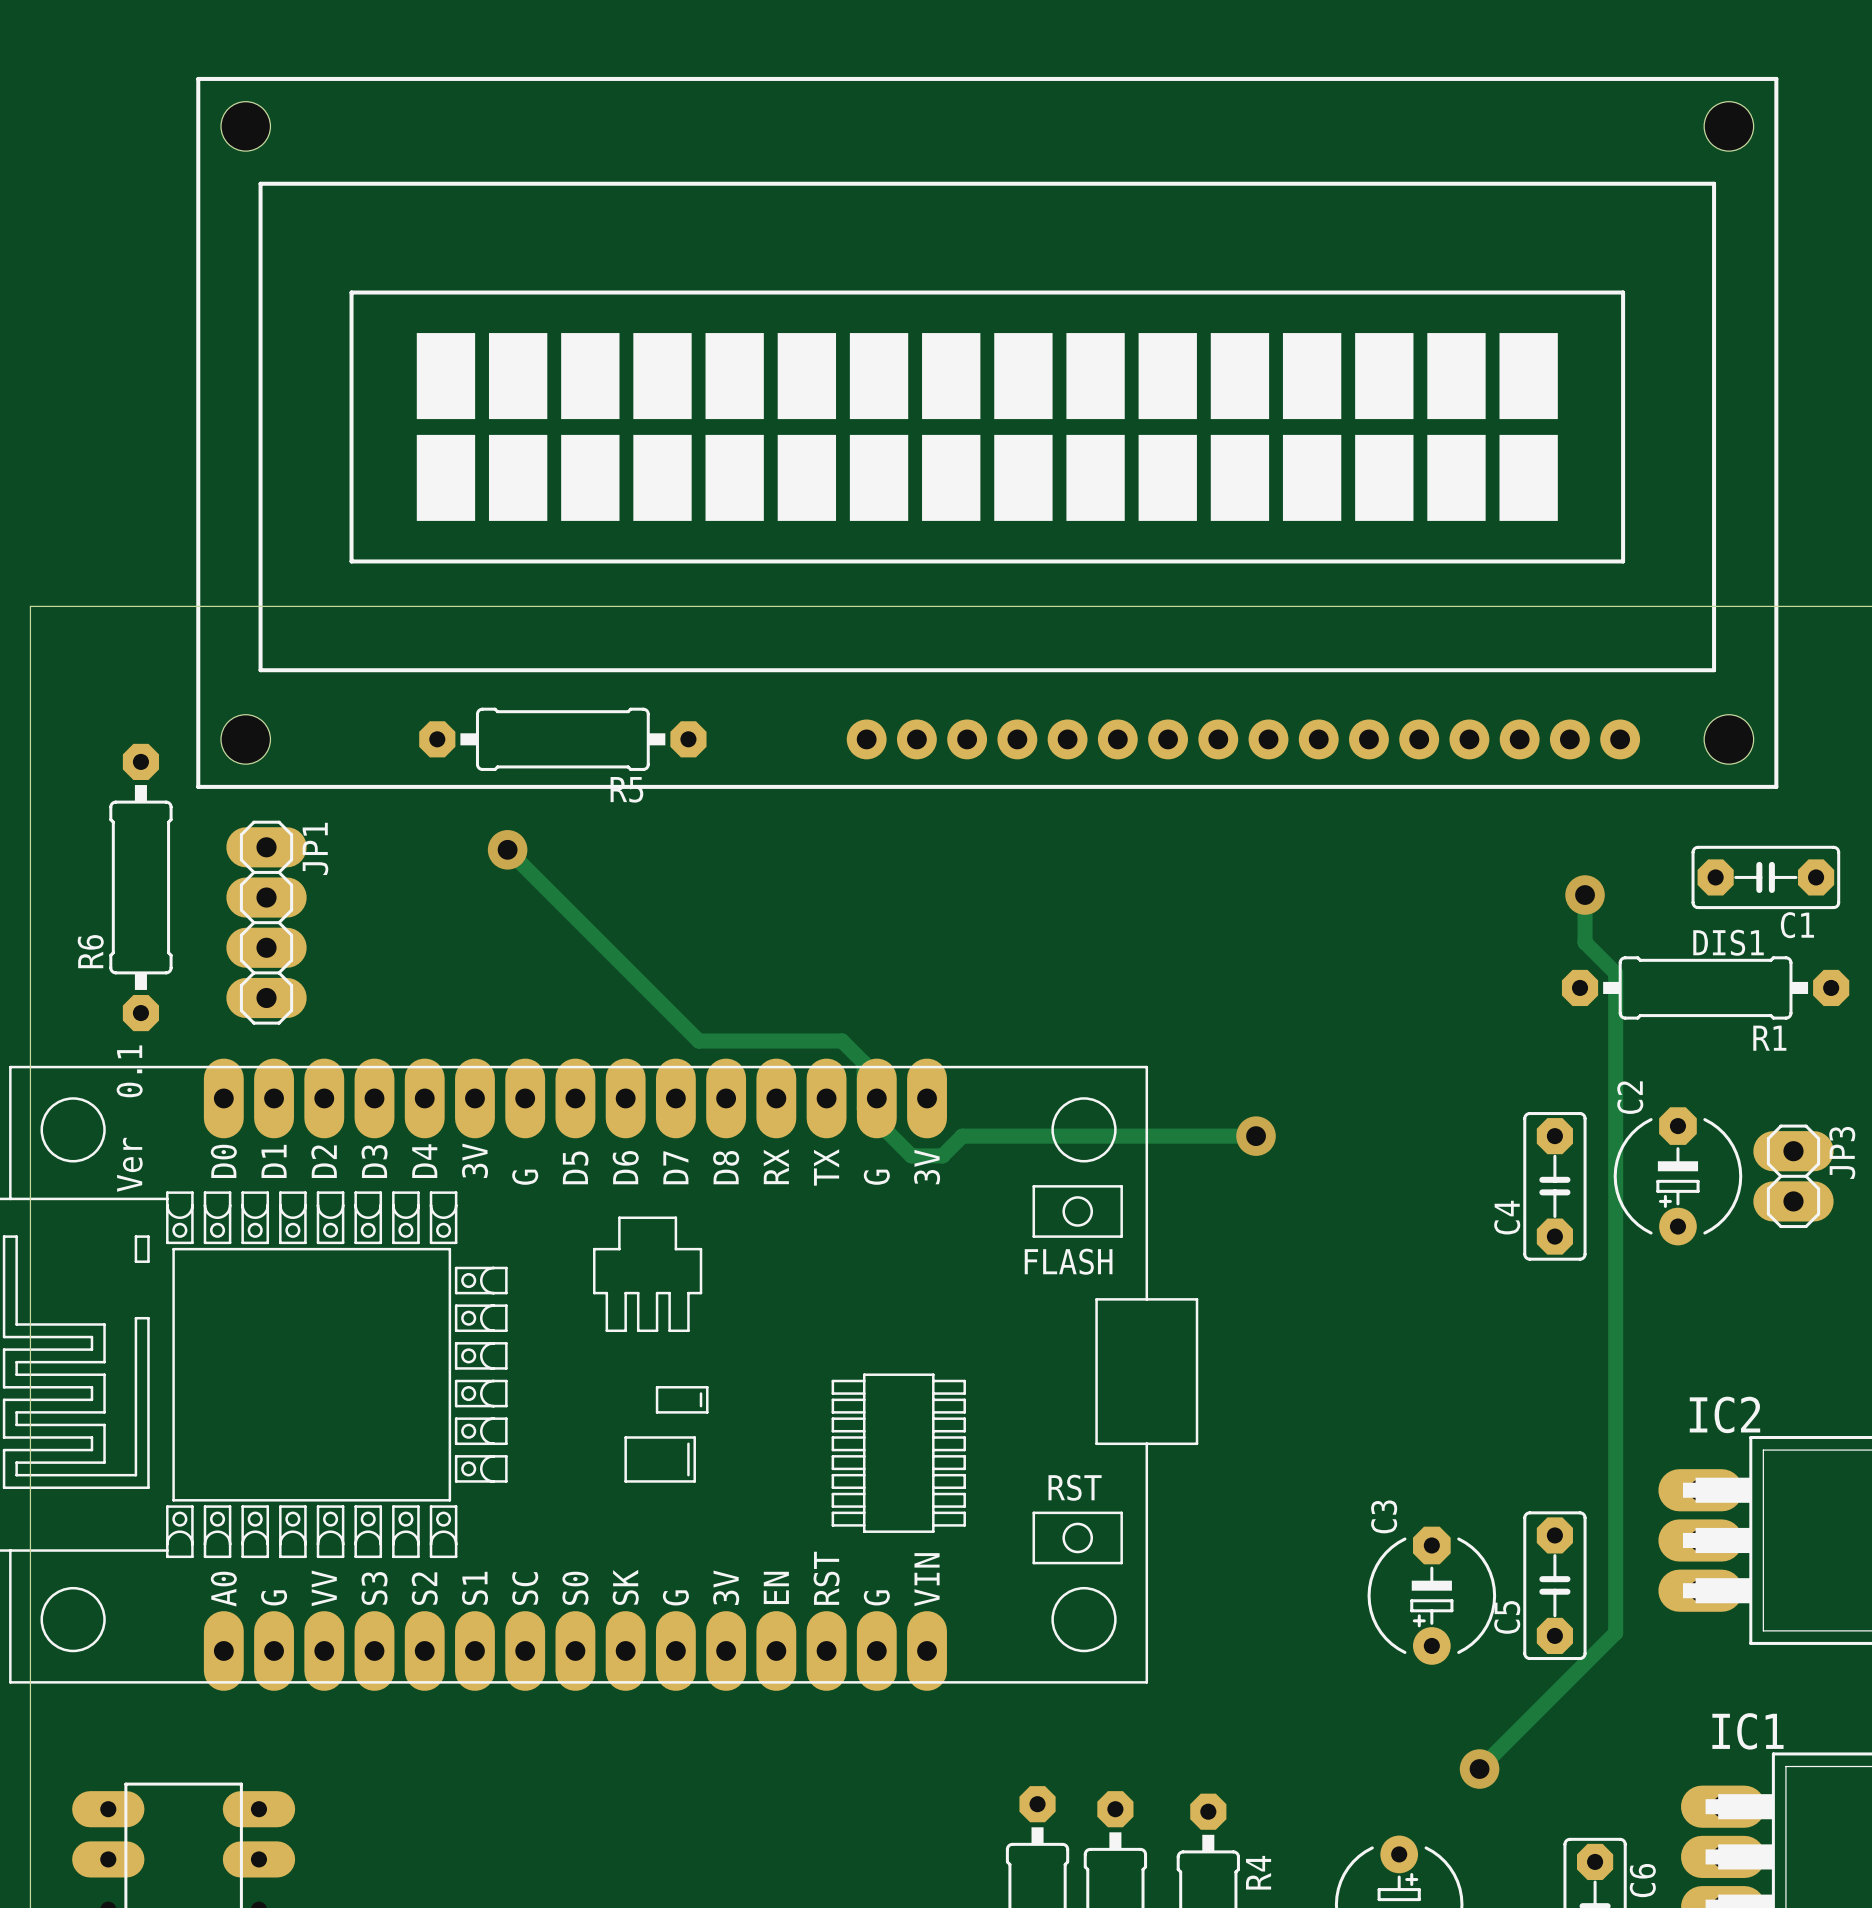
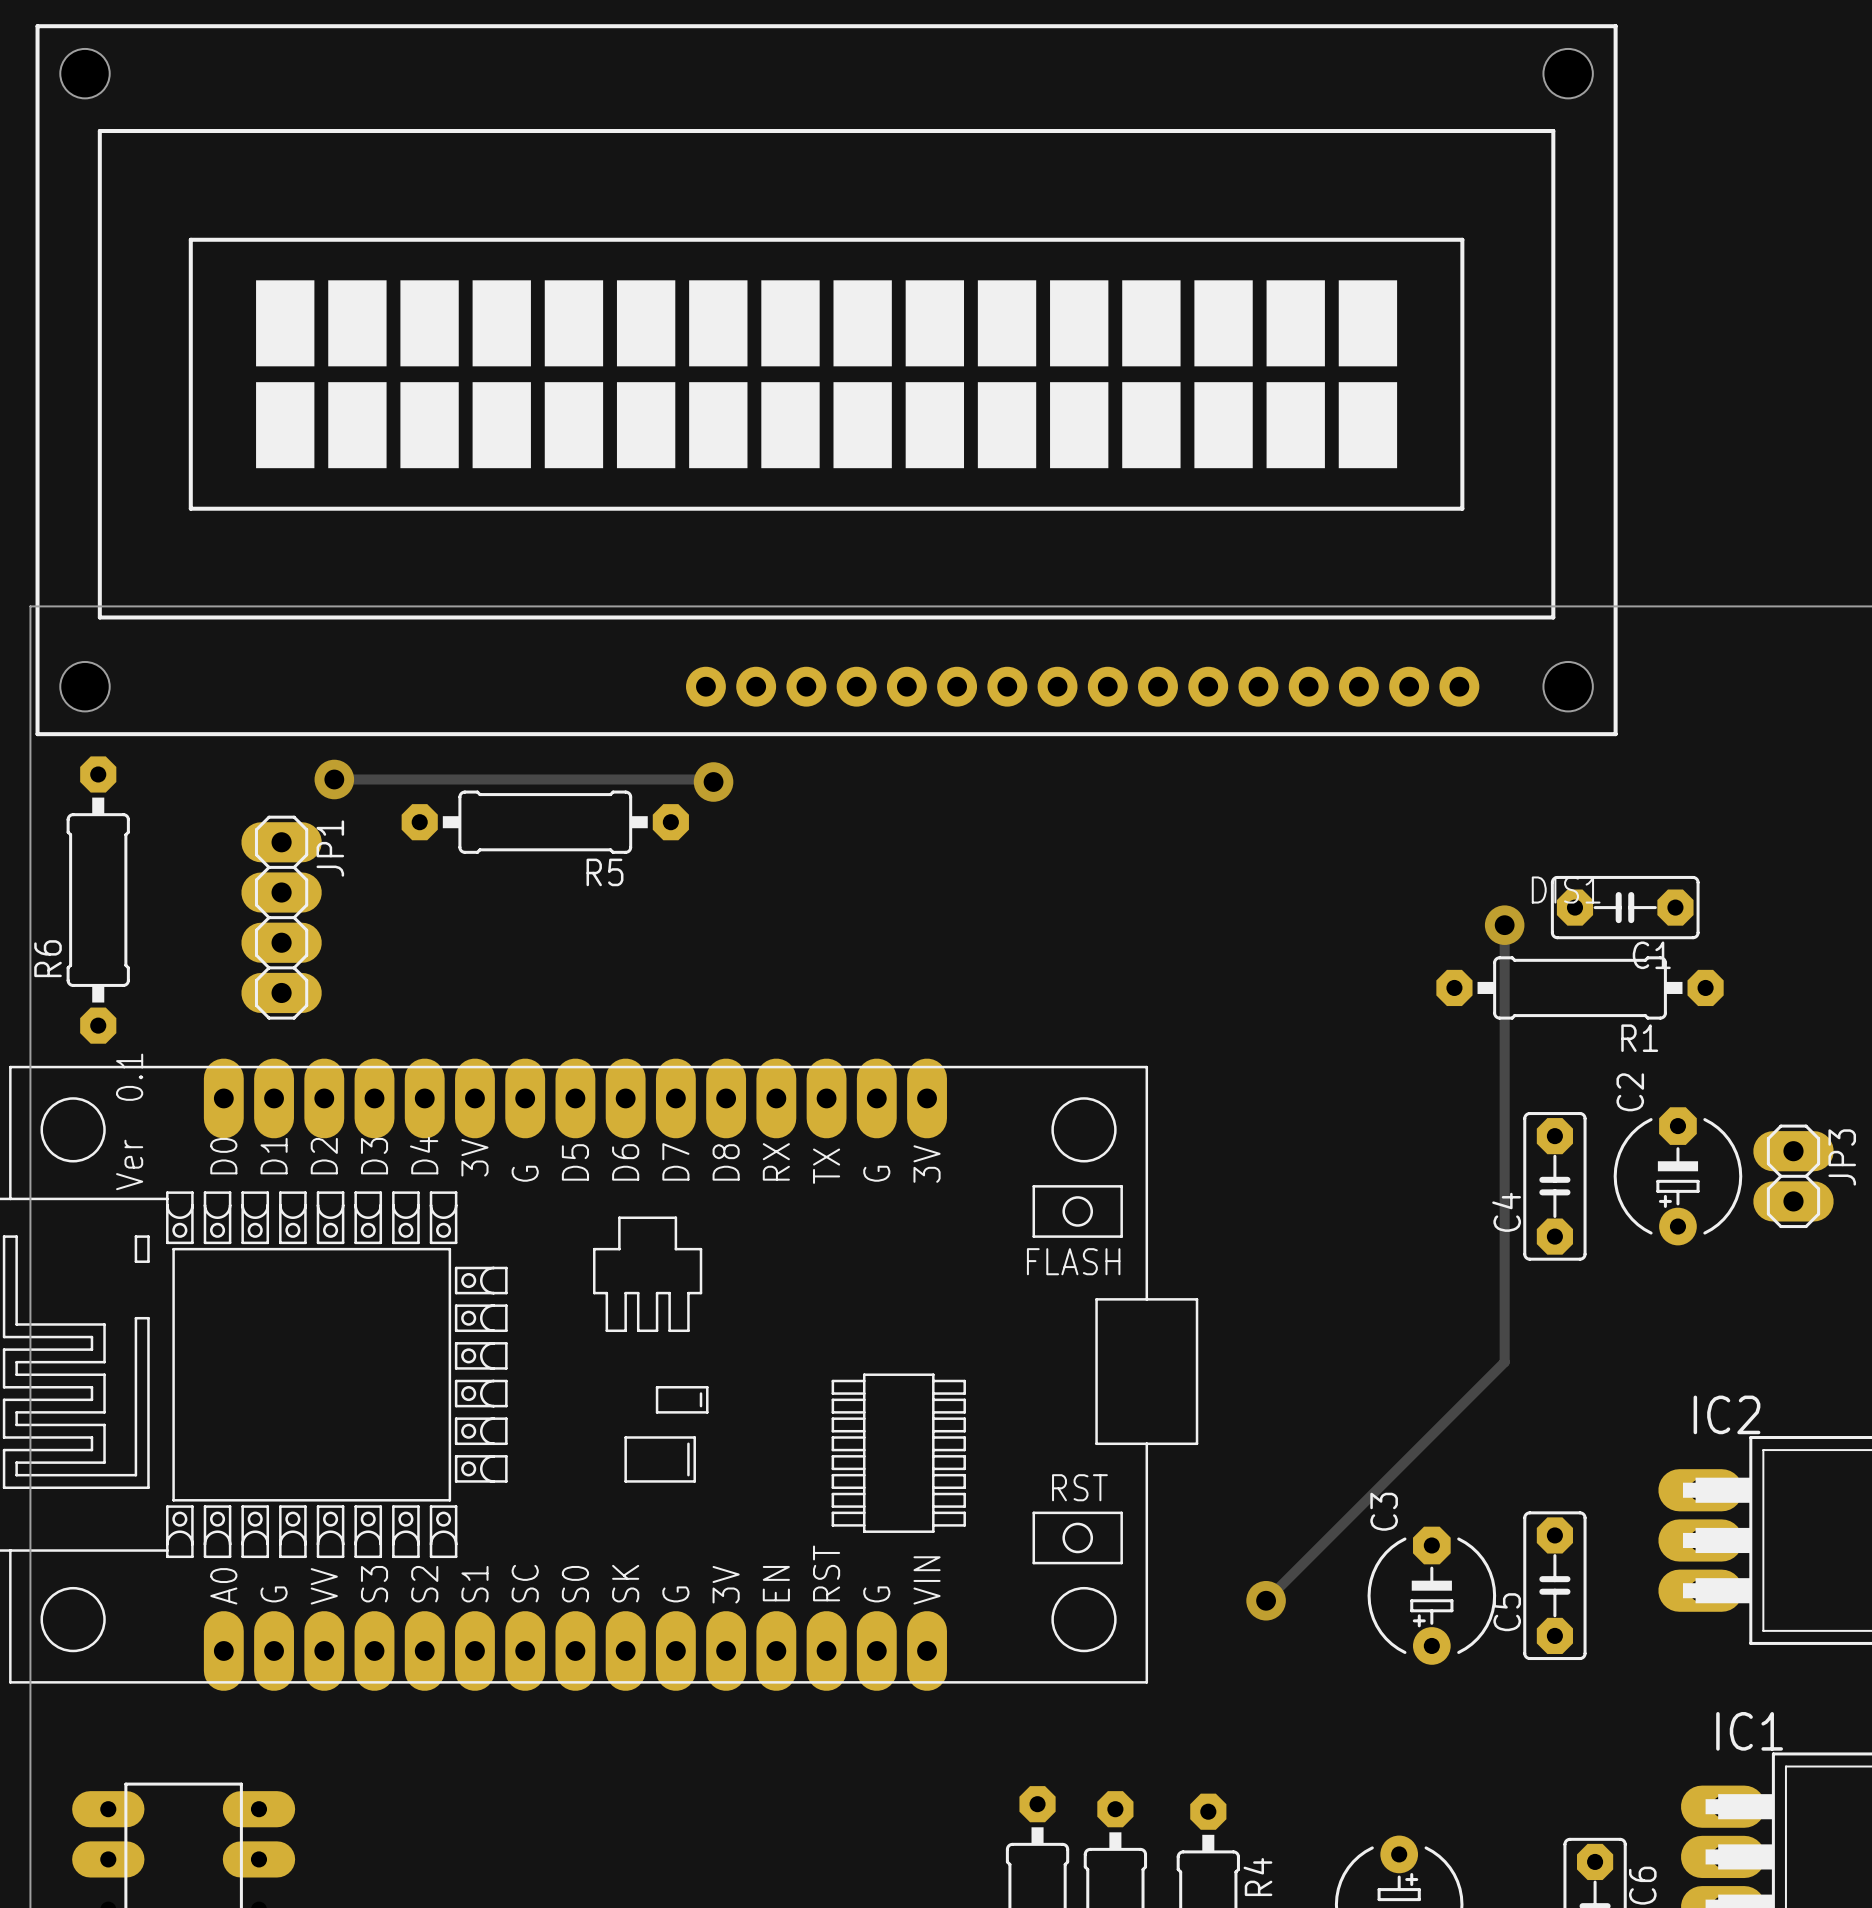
DIS1 position: (987, 432) -> (826, 380)
R5 position: (562, 739) -> (545, 822)
track: none -> (334, 779) (711, 779) (713, 782)
via: none -> (334, 779)
via: none -> (713, 782)
track: (507, 849) (698, 1041) (842, 1041) (864, 1062) (864, 1108) (911, 1155) (942, 1155) (962, 1136) (1256, 1136) -> none
via: (507, 849) -> none
C1 position: (1765, 877) -> (1625, 907)
R6 position: (140, 887) -> (98, 900)
track: (1585, 895) (1585, 942) (1615, 973) (1615, 1632) (1479, 1769) -> none
via position: (1585, 895) -> (1504, 925)
JP1 position: (266, 922) -> (281, 917)
track: none -> (1504, 925) (1504, 1362) (1266, 1600)
R1 position: (1705, 987) -> (1580, 987)
via: (1256, 1136) -> none
via: none -> (1266, 1600)
via: (1479, 1769) -> none

